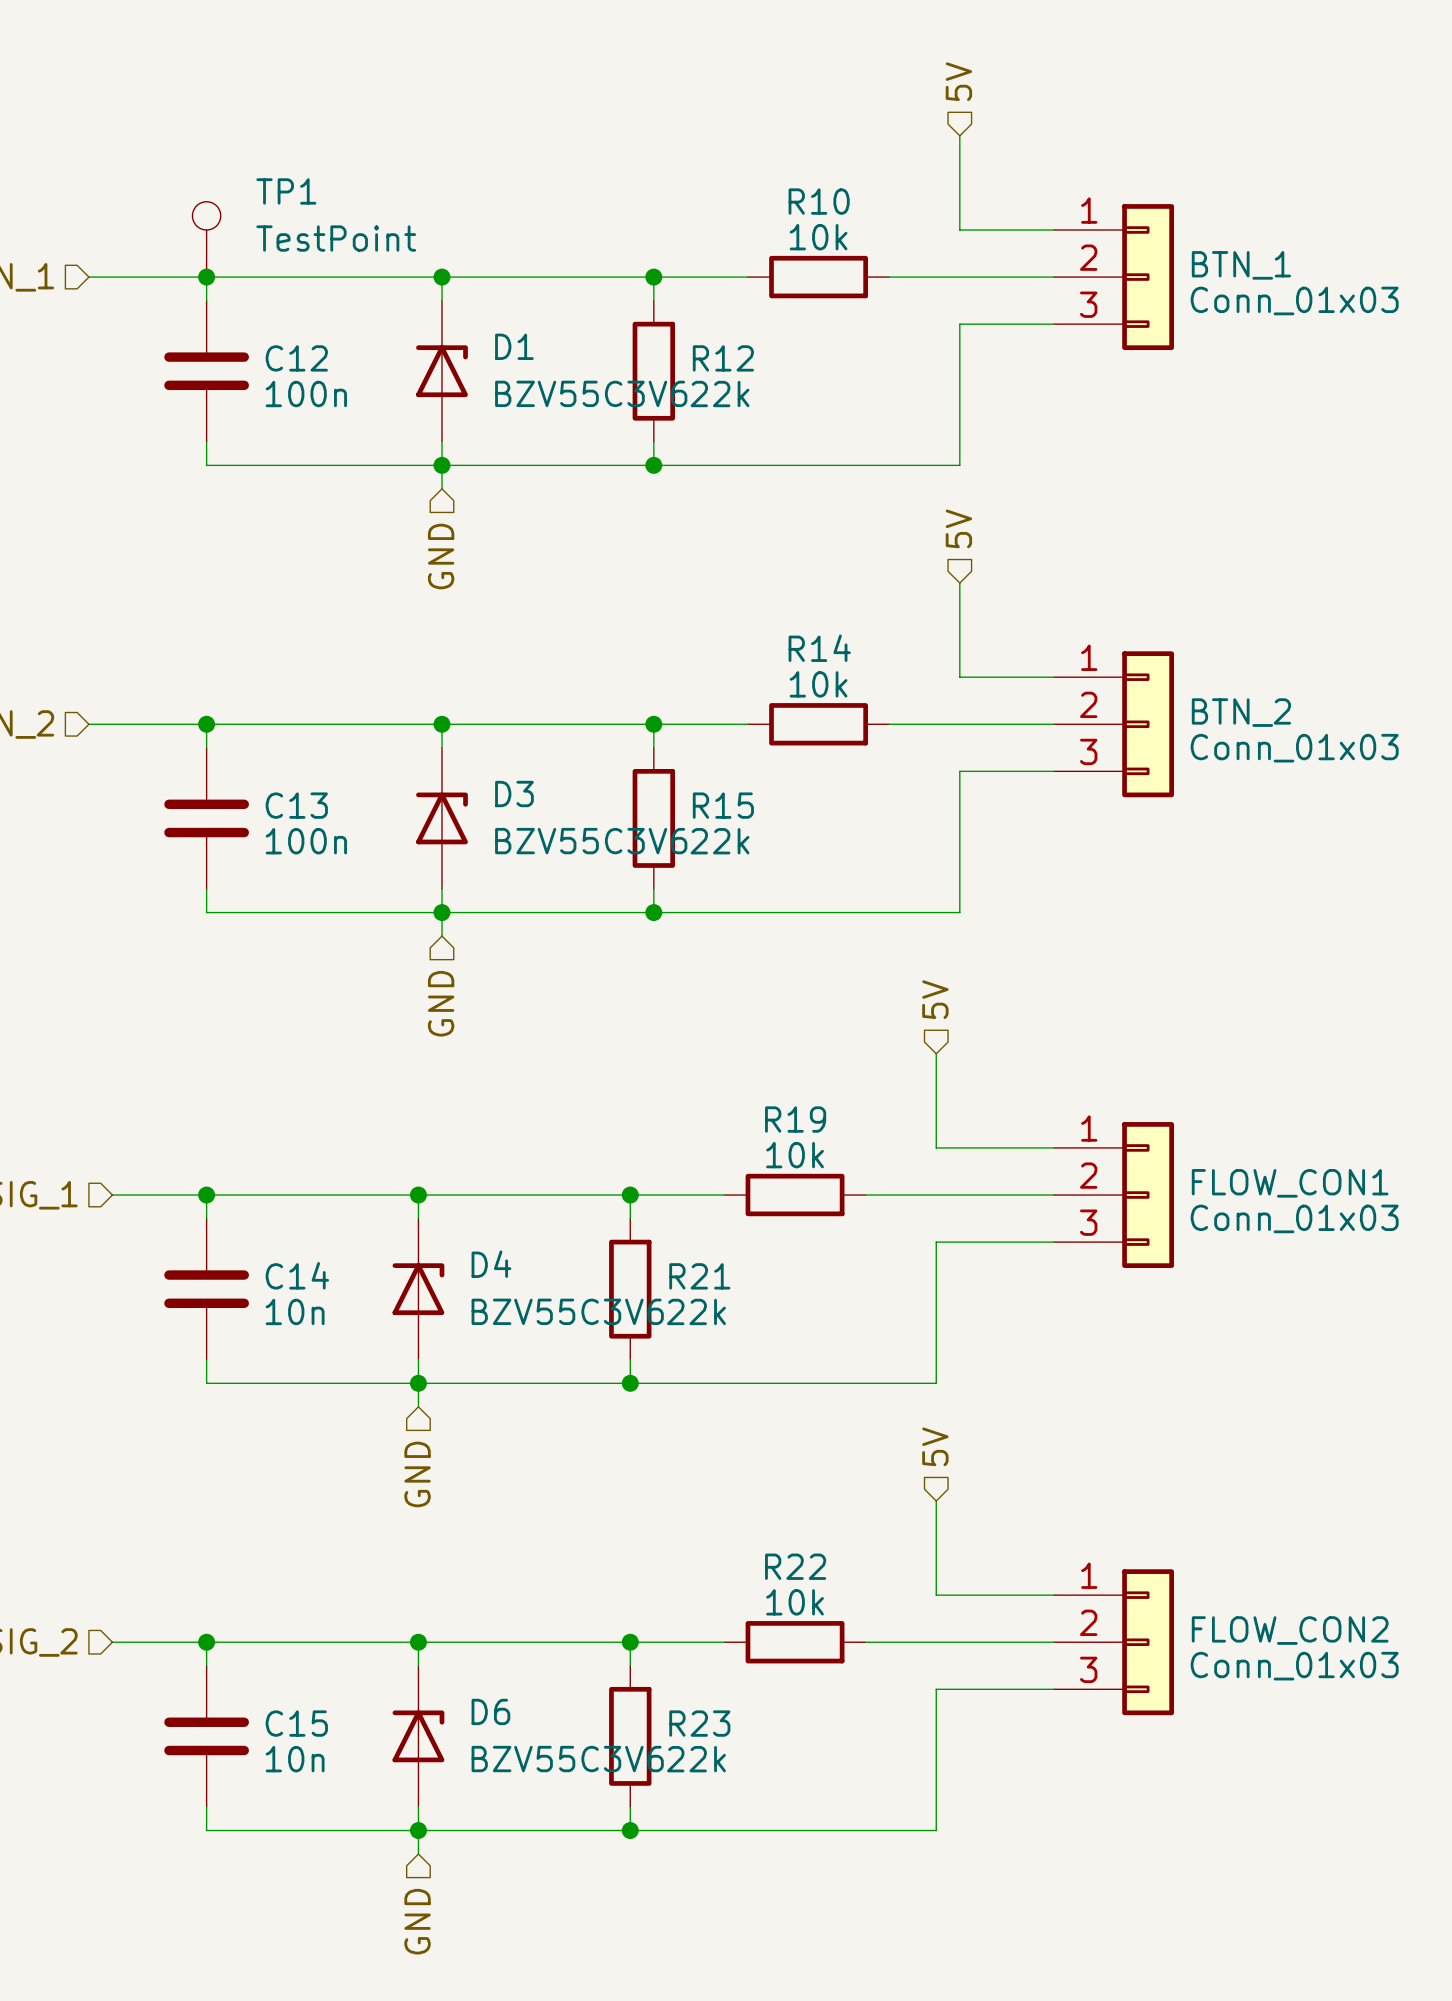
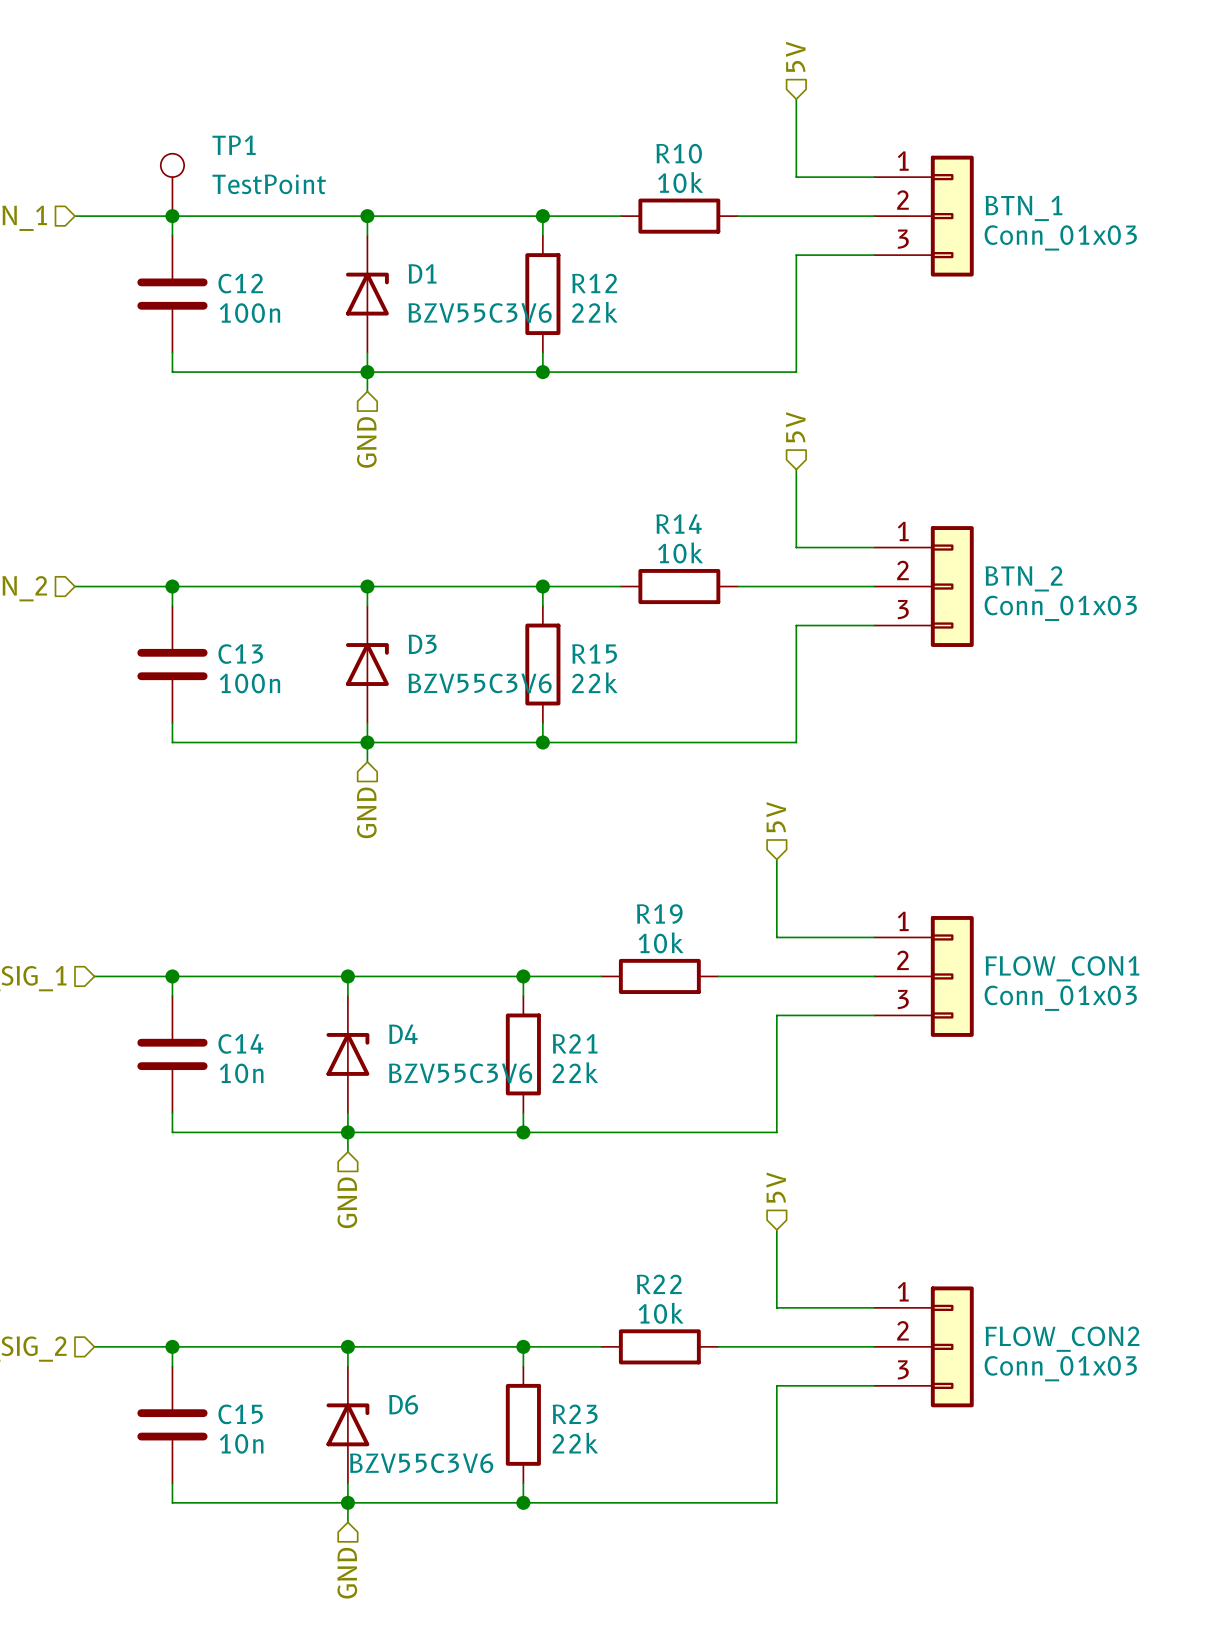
D6 value position: BZV55C3V6 (567, 1759) -> BZV55C3V6 (421, 1463)

